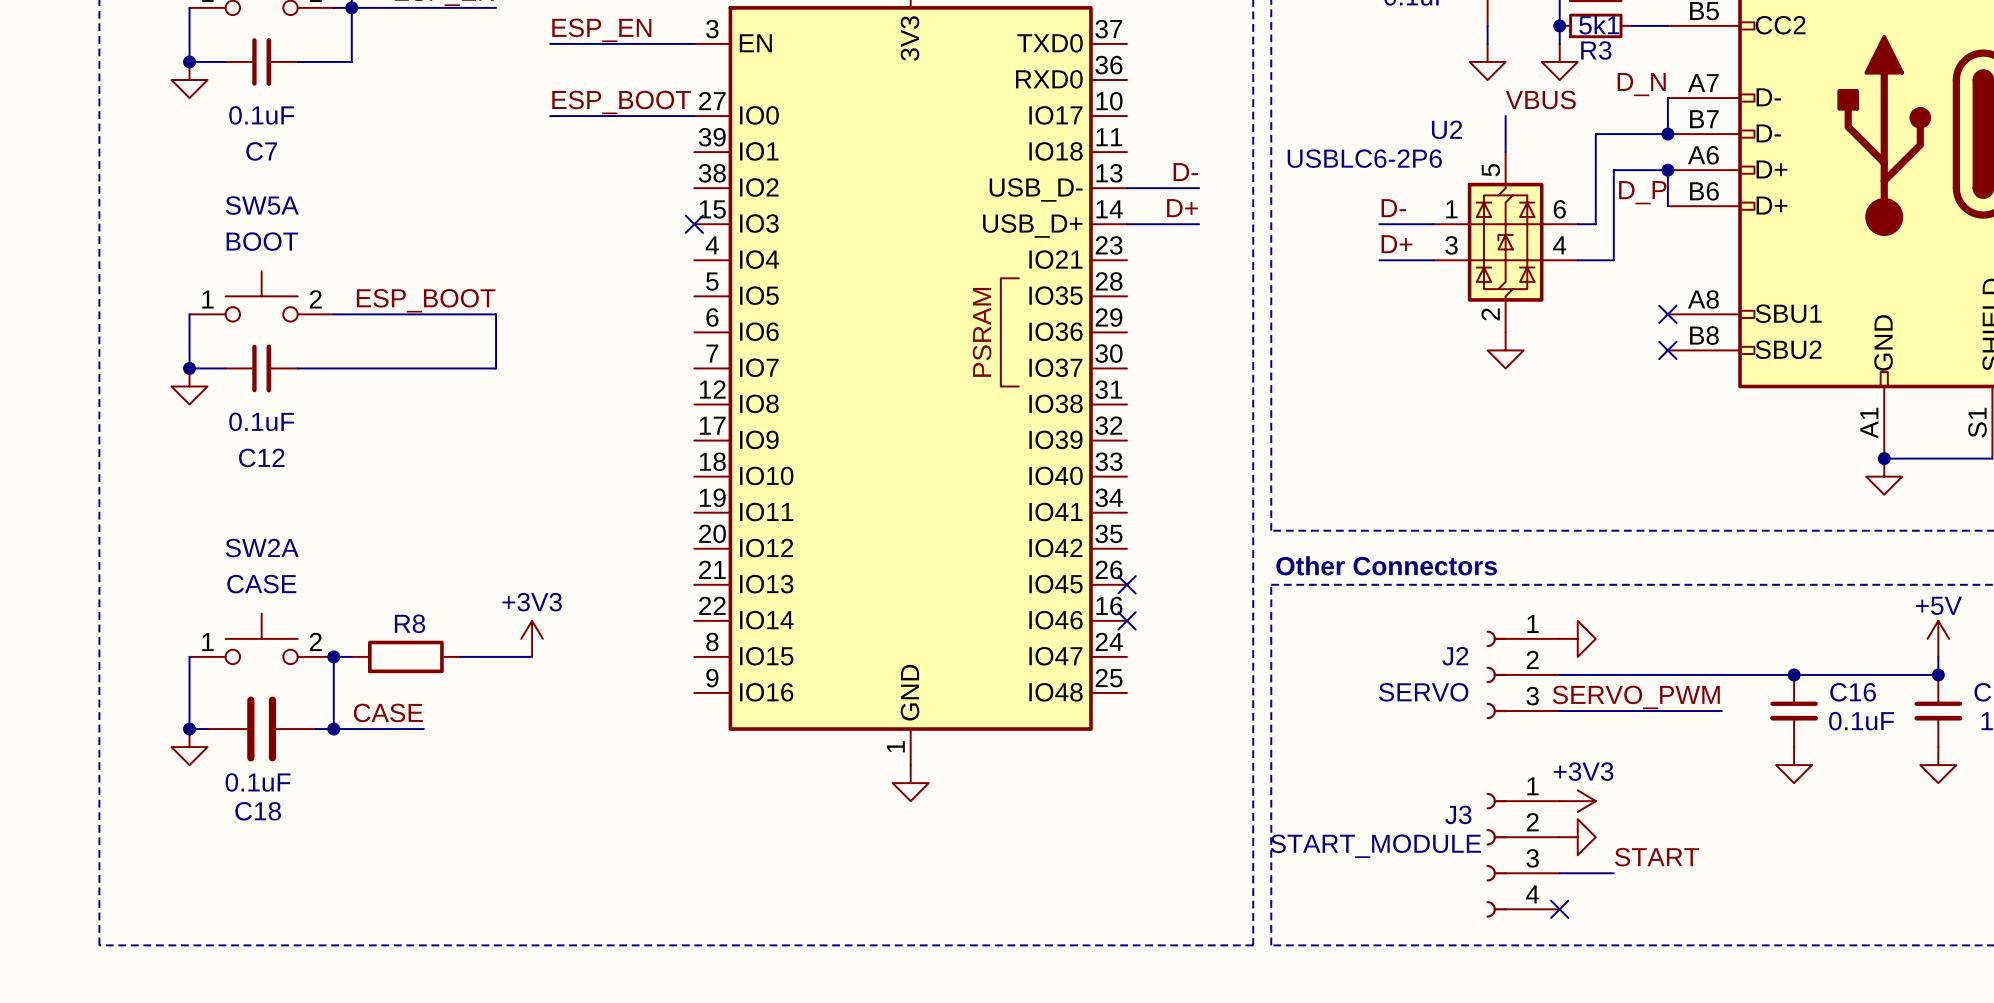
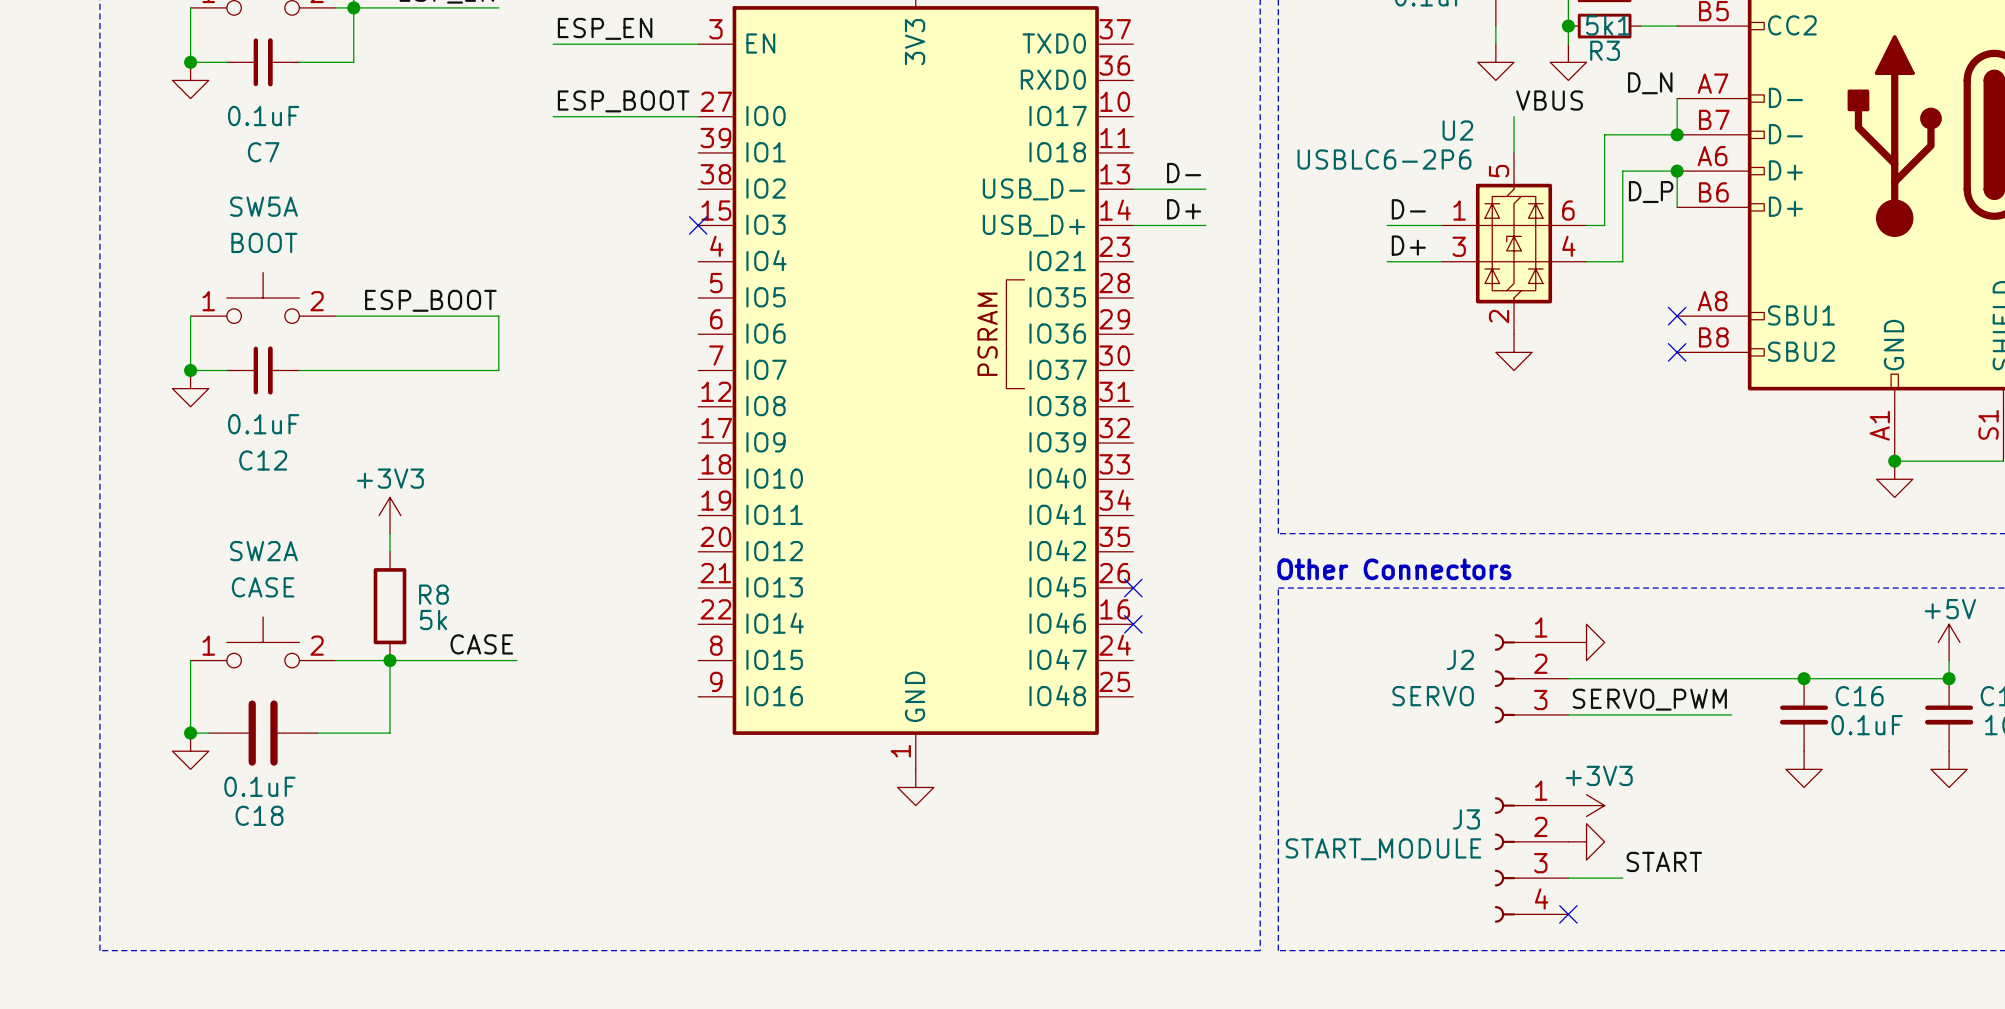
wire: none -> (390, 533) (390, 551)
R8 value: none -> 5k (433, 620)
power symbol position: +3V3 (532, 638) -> +3V3 (390, 515)
wire: (333, 656) (333, 729) -> none
junction: (333, 656) -> none
wire: none -> (353, 660) (462, 660)
junction: none -> (390, 660)
R8 rotation: 0° (405, 656) -> 90° clockwise (390, 606)
wire: (514, 656) (532, 656) -> none
label position: CASE (388, 712) -> CASE (481, 644)
junction: (333, 729) -> none
wire: (387, 729) (423, 729) -> (390, 733) (390, 660)

